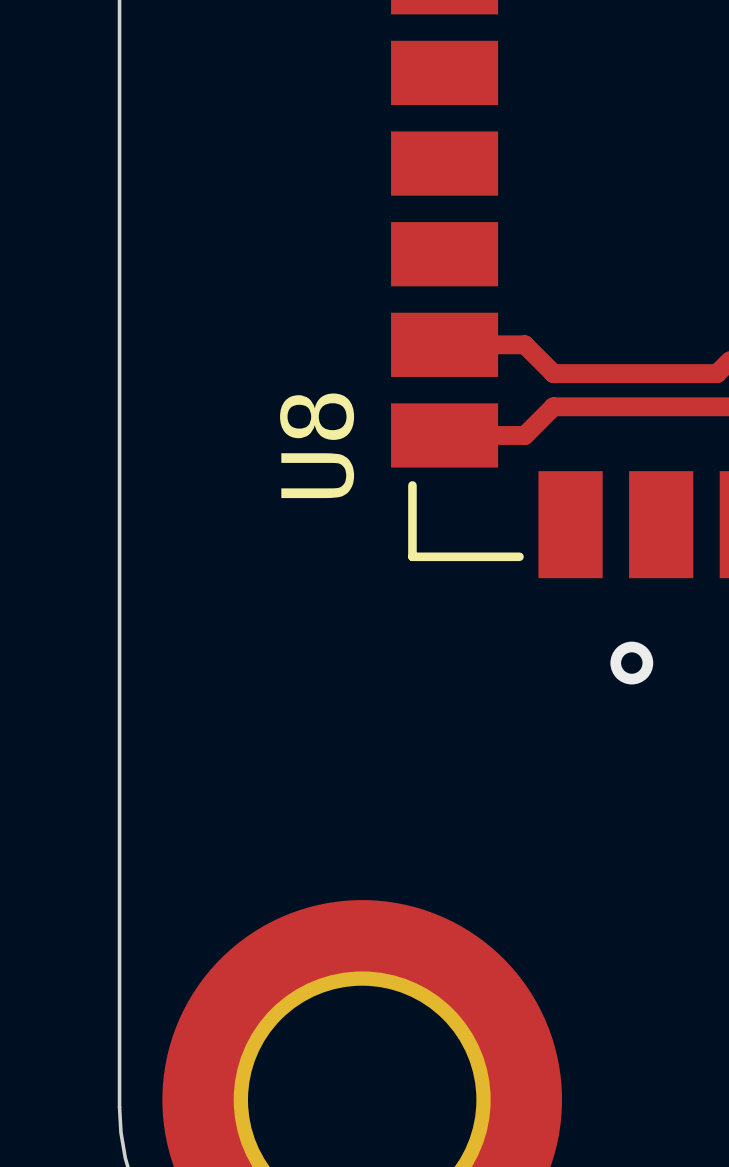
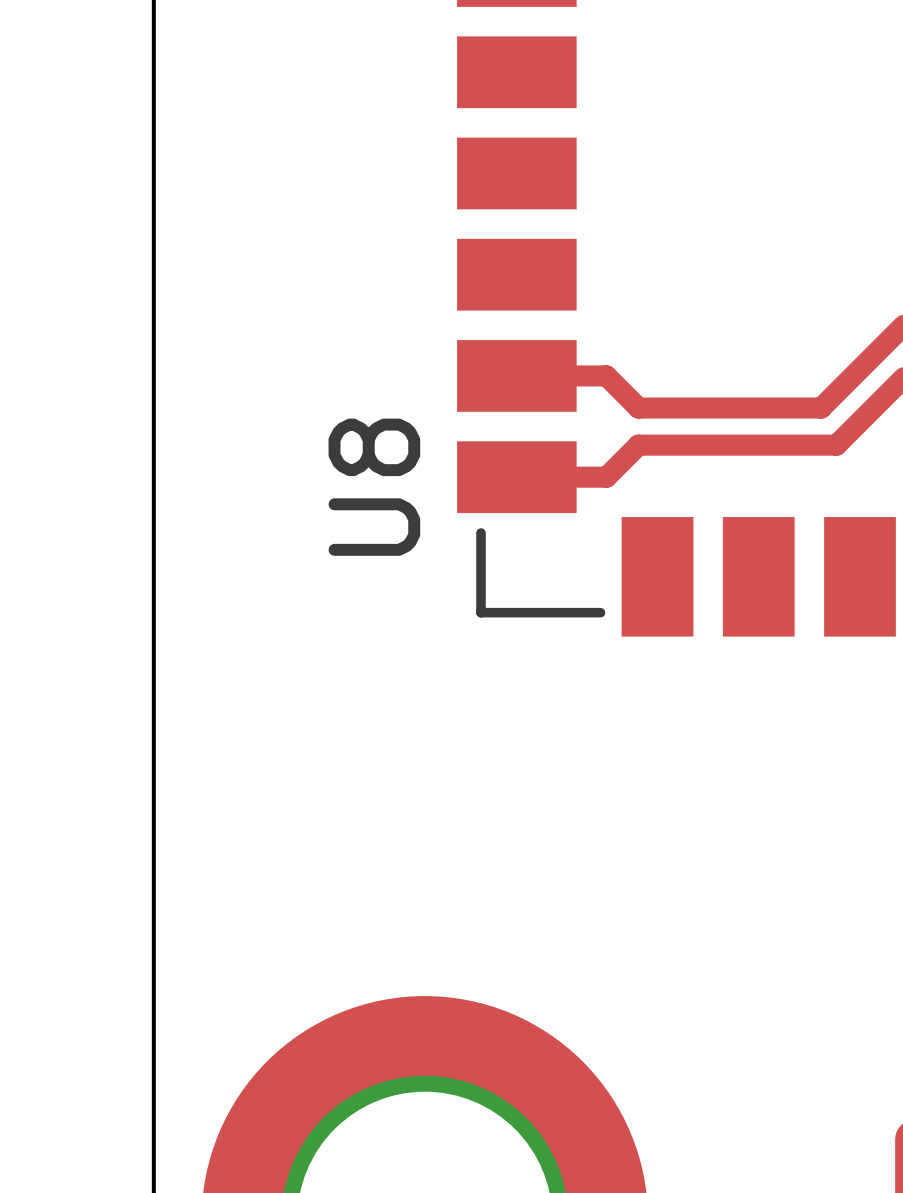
via: (631, 663) -> none

